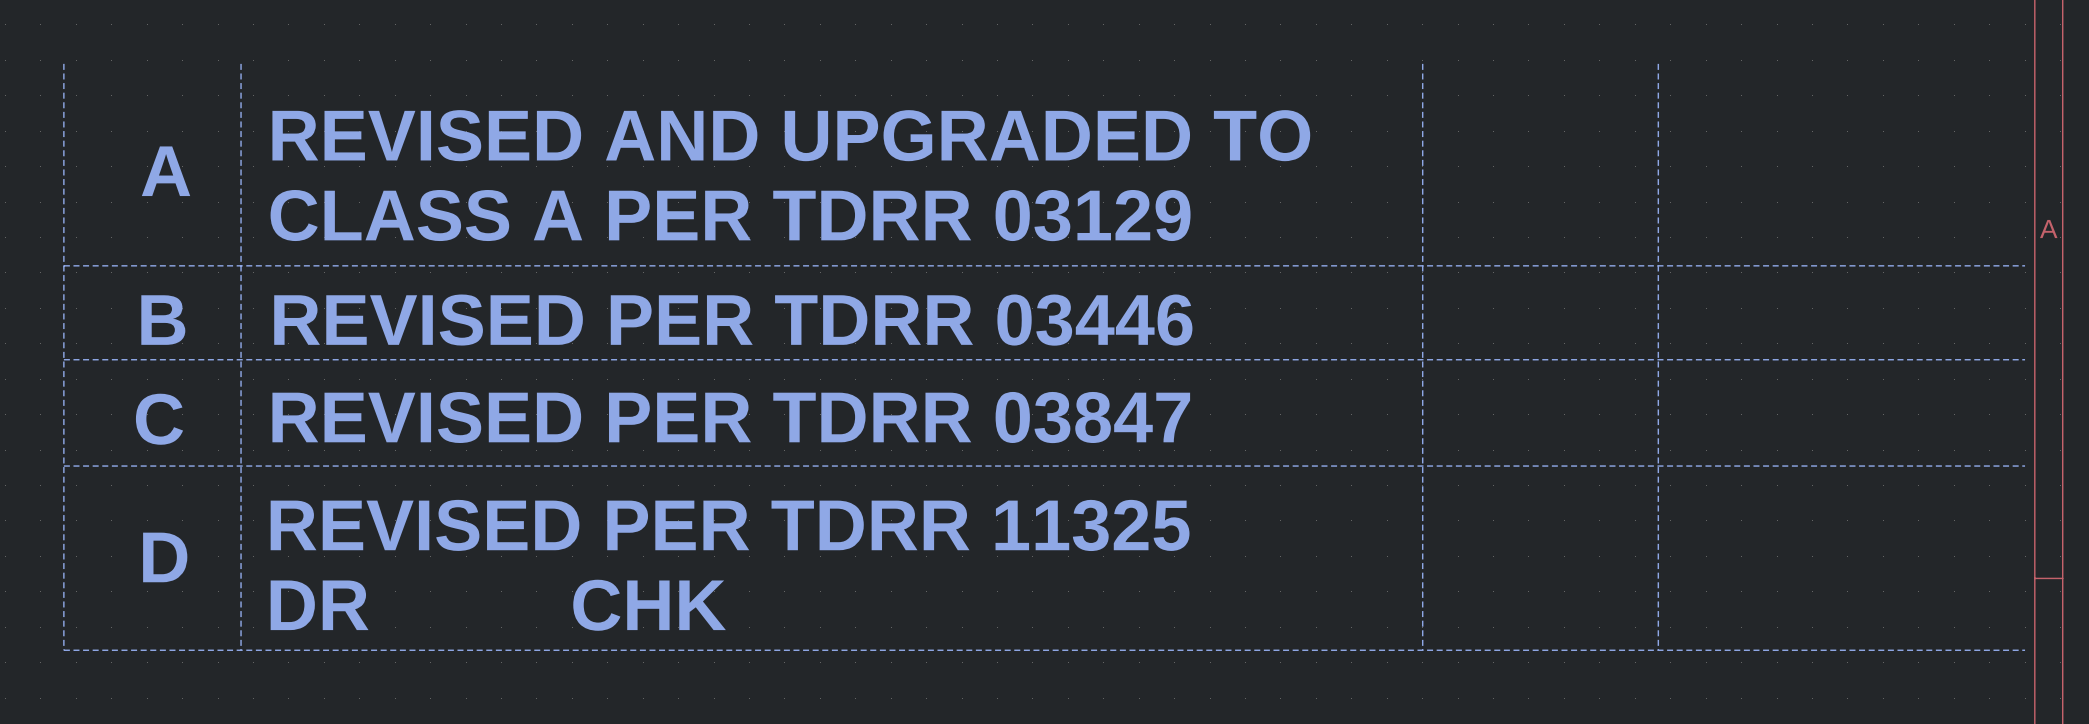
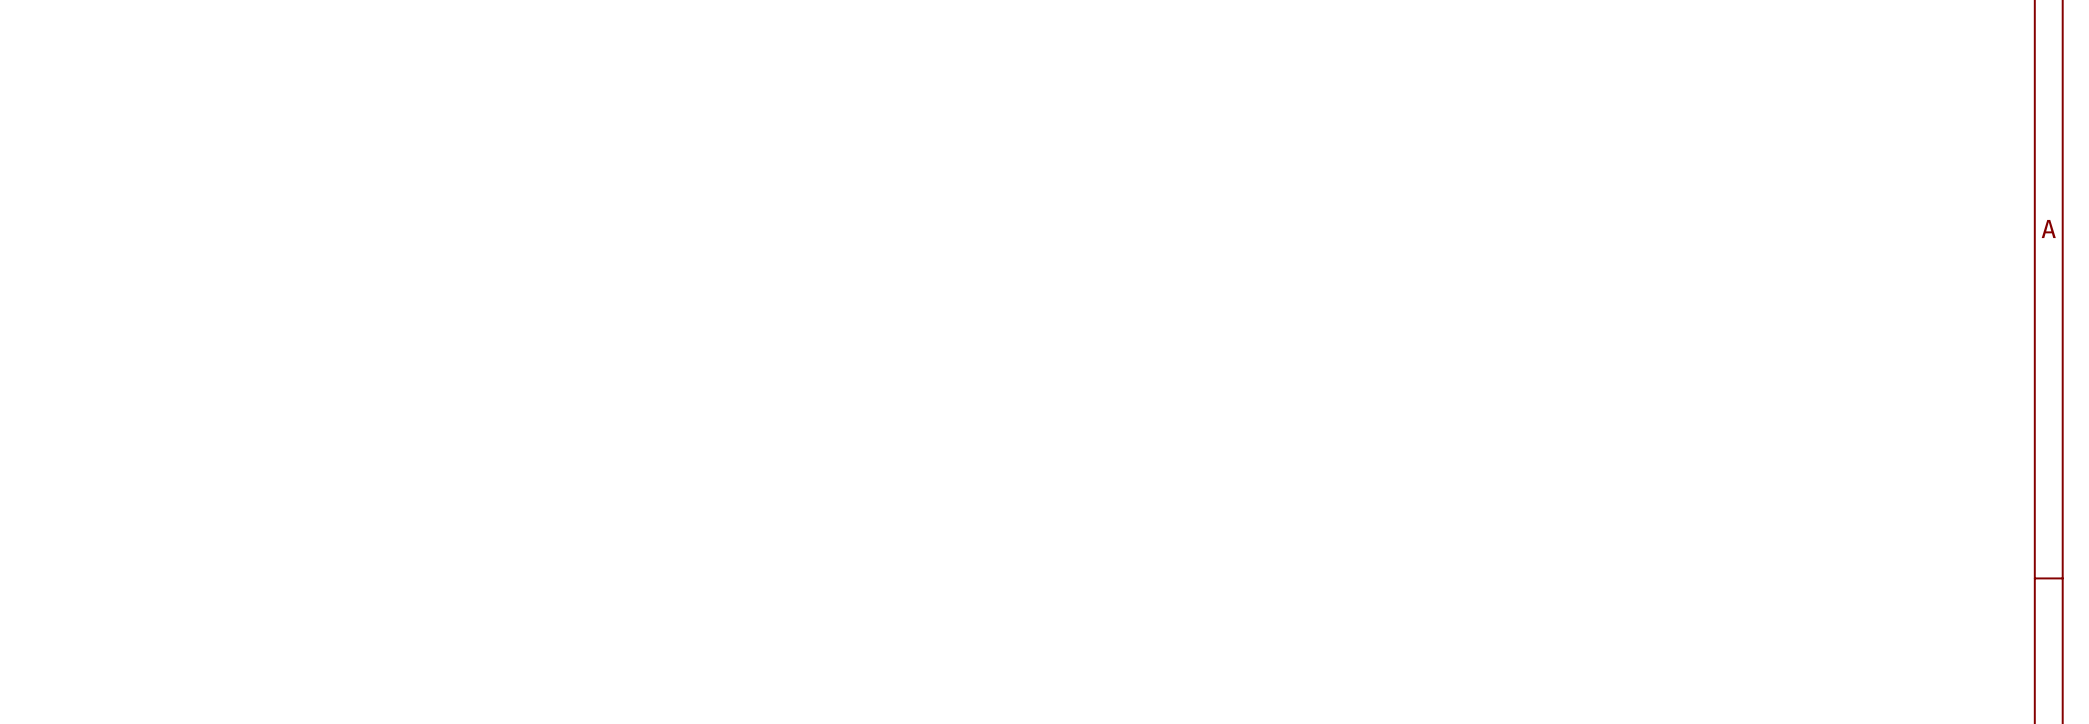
line: (63, 63) (63, 650) (2025, 650) -> none
line: (241, 63) (241, 650) -> none
line: (1422, 63) (1422, 650) -> none
line: (1658, 63) (1658, 650) -> none
text: REVISED AND UPGRADED TO (791, 135) -> none
text: A (166, 171) -> none
text: CLASS A PER TDRR 03129 (730, 215) -> none
line: (63, 265) (2025, 265) -> none
text: B (163, 320) -> none
text: REVISED PER TDRR 03446 (733, 320) -> none
line: (63, 359) (2025, 359) -> none
text: REVISED PER TDRR 03847 (731, 417) -> none
text: C (159, 419) -> none
line: (63, 466) (2025, 466) -> none
text: REVISED PER TDRR 11325 (730, 525) -> none
text: D (165, 557) -> none
text: DR CHK (498, 605) -> none

